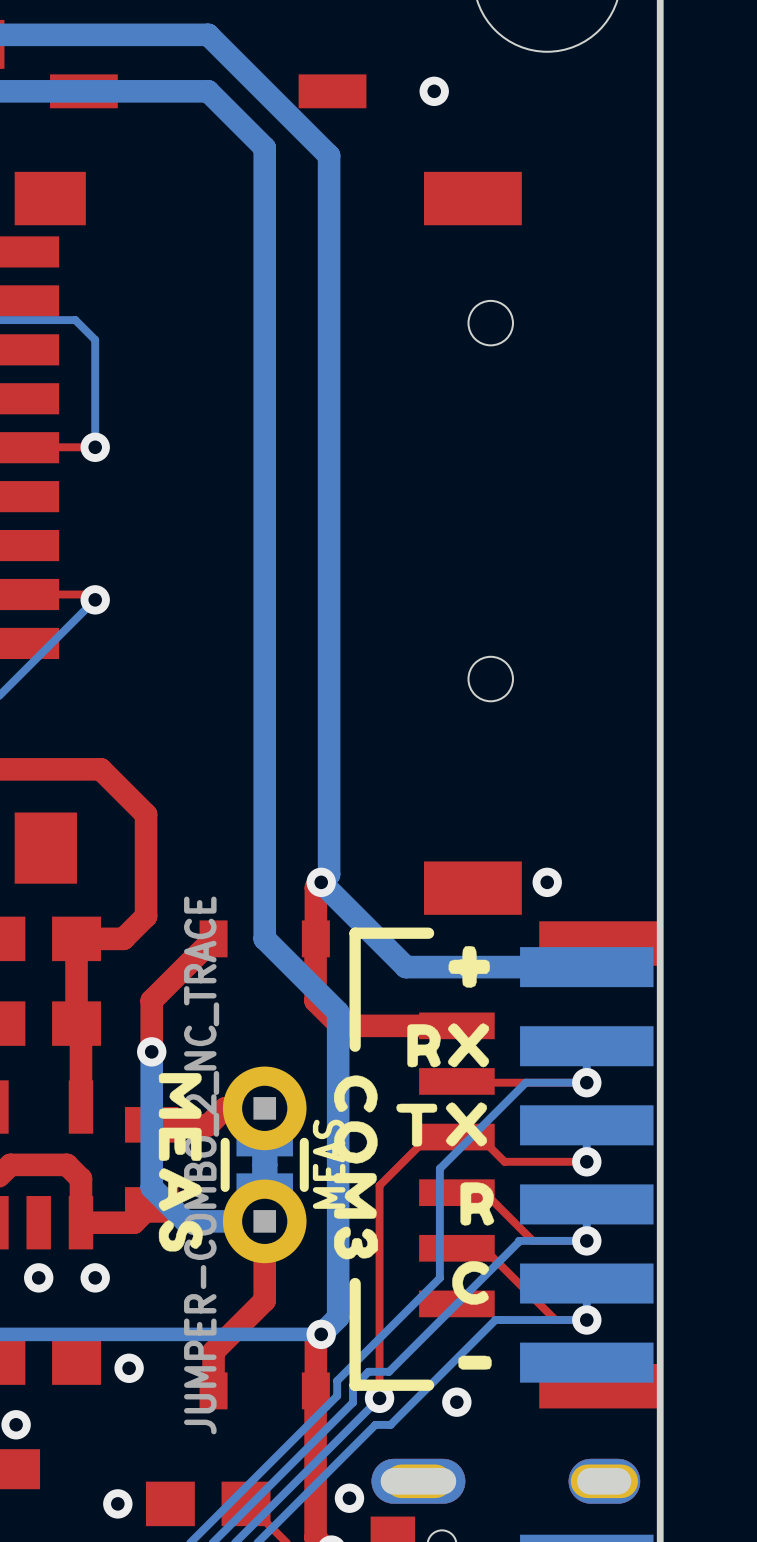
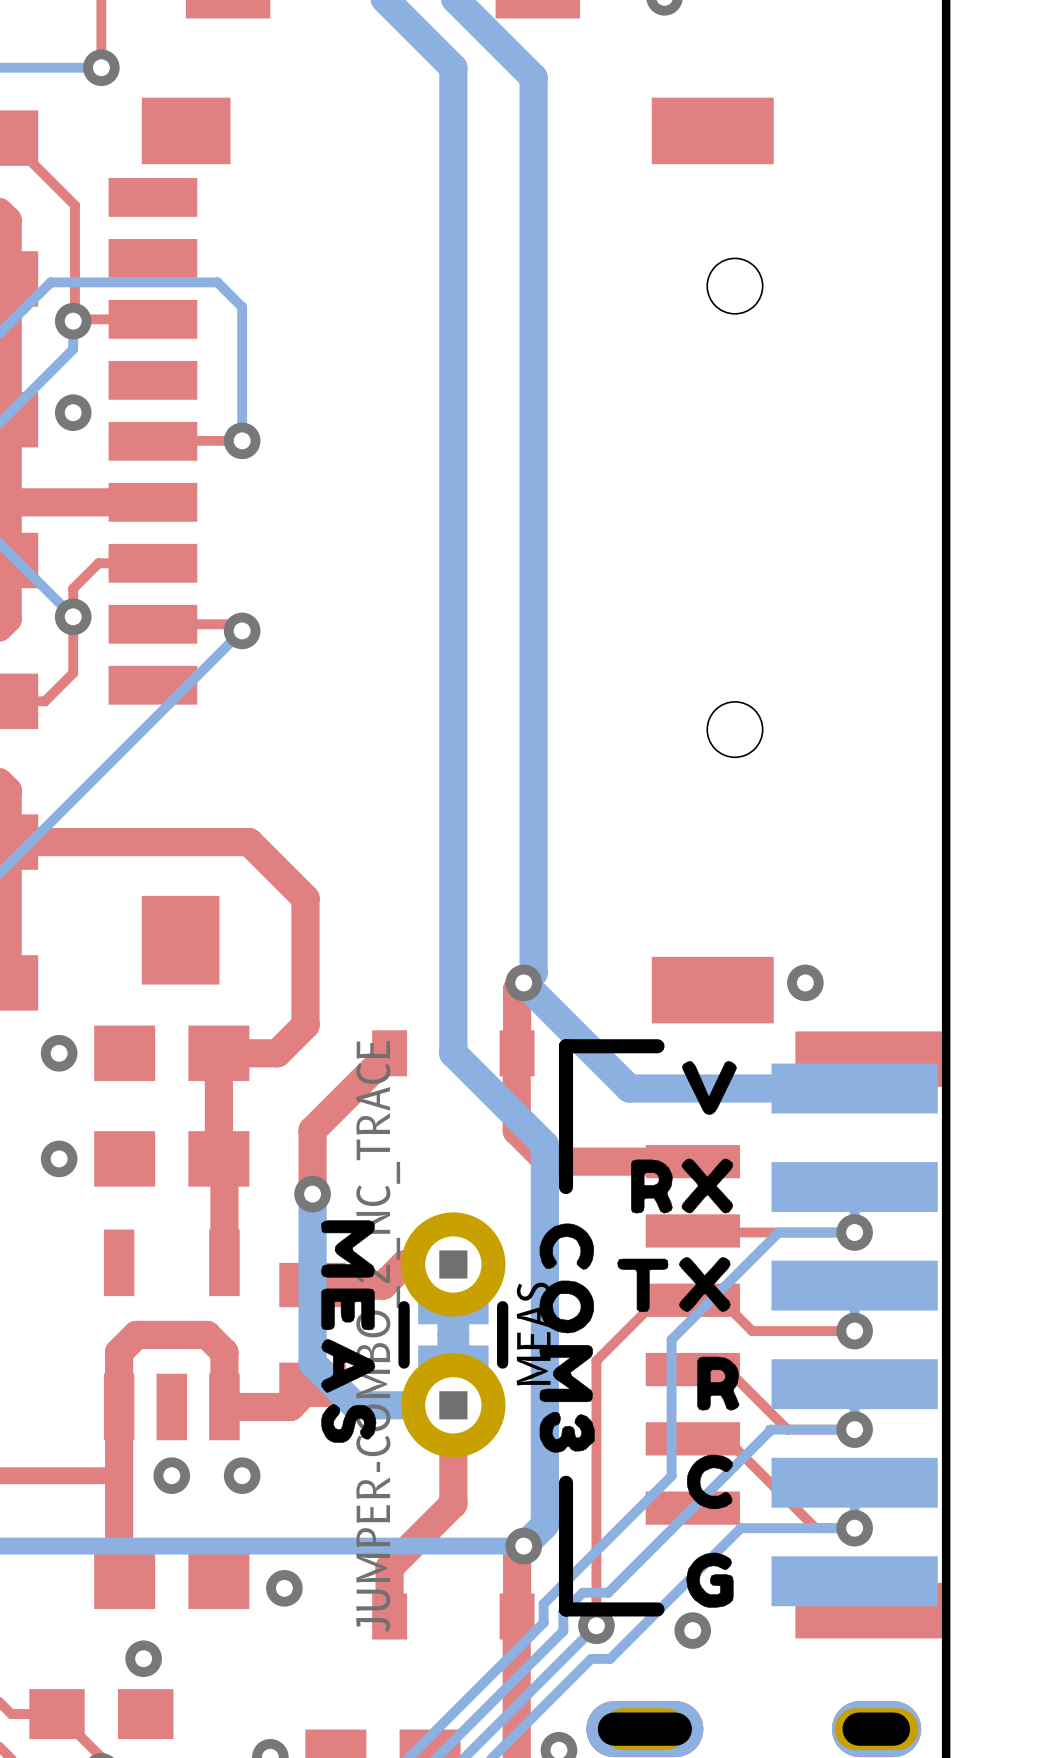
drawing shape: [448, 945, 491, 988] -> [681, 1061, 737, 1115]
drawing shape: [458, 1355, 492, 1370] -> [686, 1552, 734, 1608]

